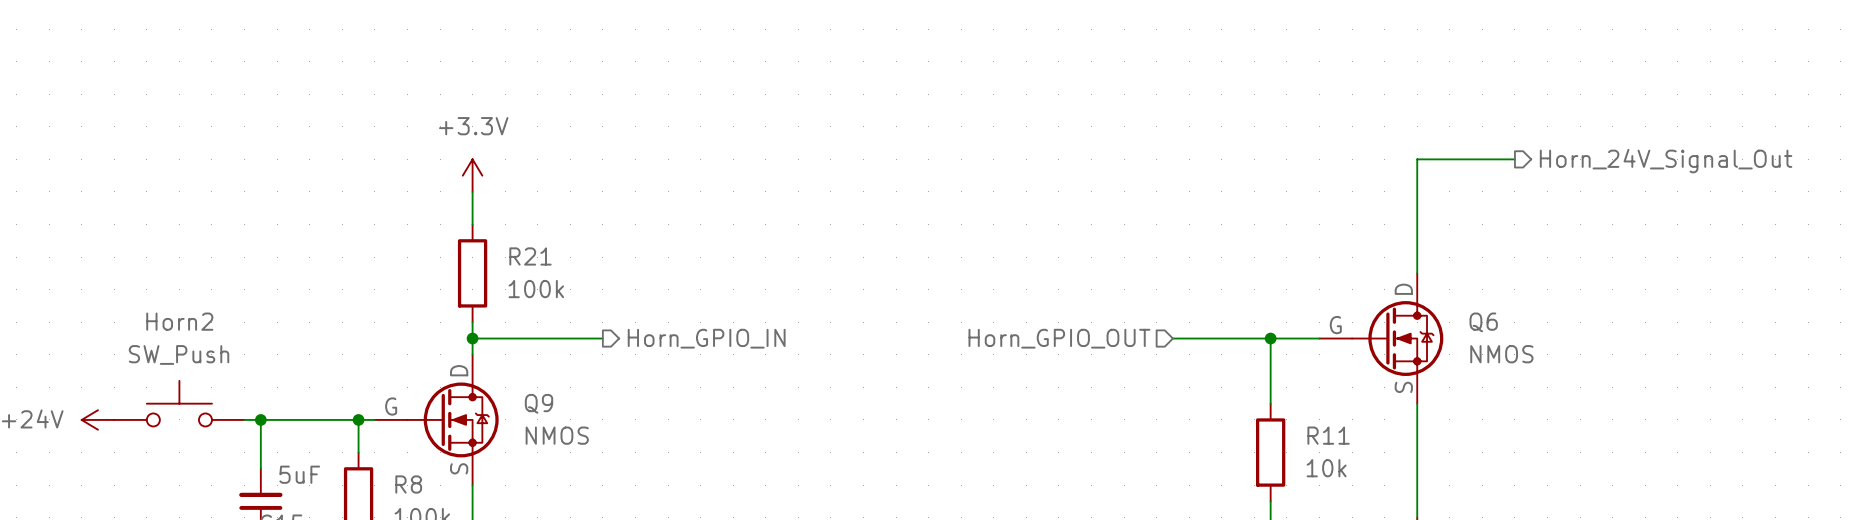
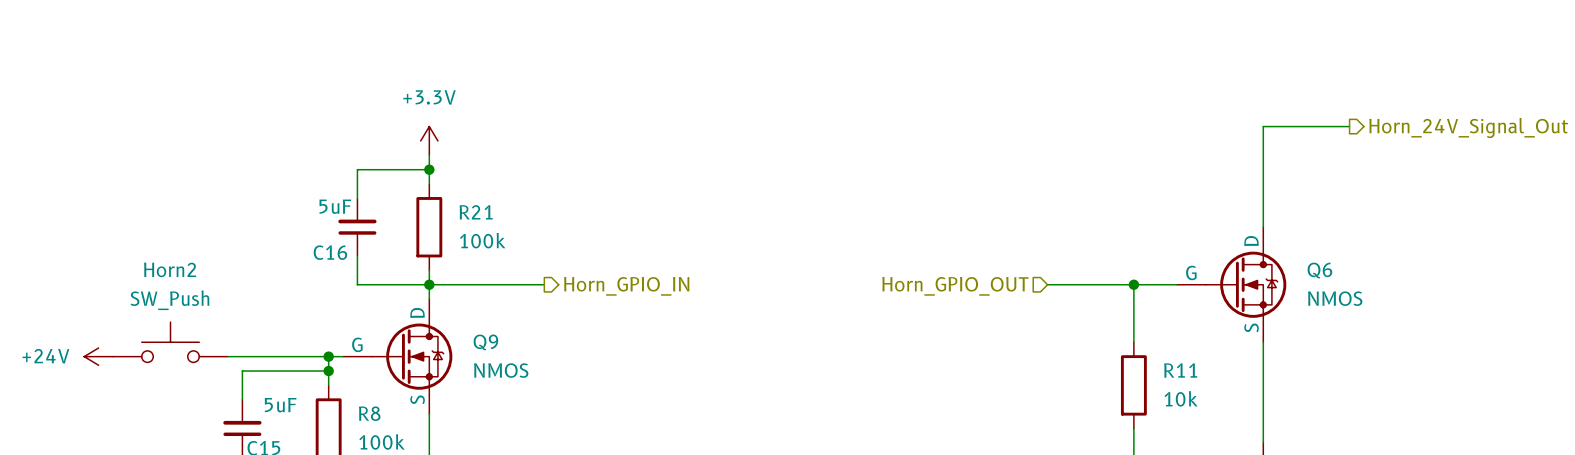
wire: none -> (429, 169) (357, 169) (357, 198)
junction: none -> (429, 169)
C16: none -> 5uF (357, 227)
wire: none -> (357, 255) (357, 284) (429, 284)
wire: (260, 419) (260, 436) -> (328, 371) (242, 371)
junction: (260, 419) -> none
junction: none -> (328, 371)

